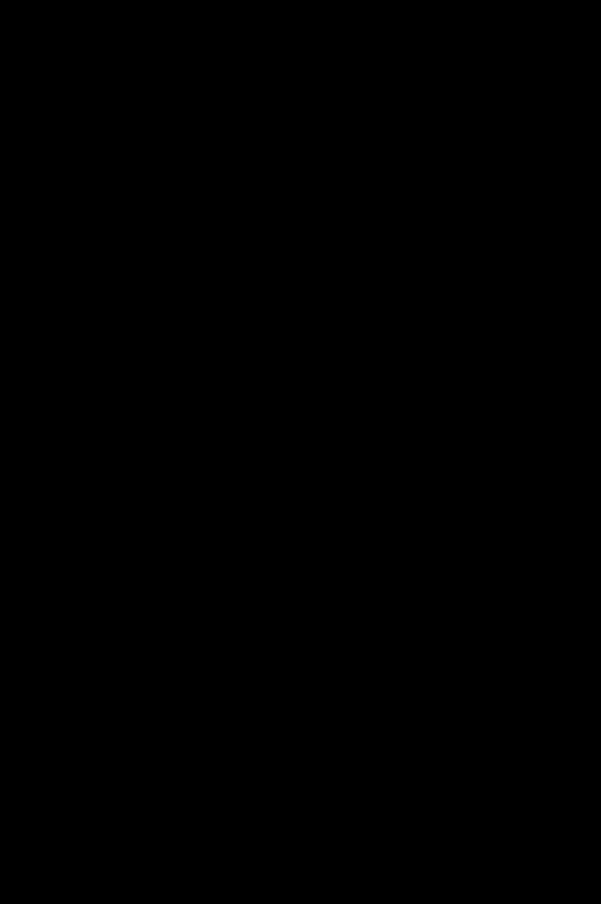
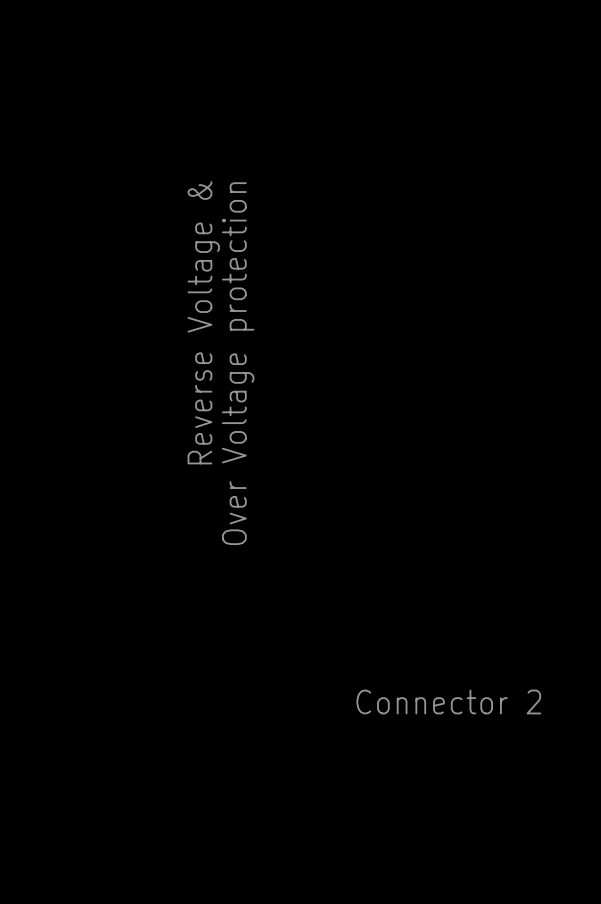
text: none -> Reverse Voltage & (203, 322)
text: none -> Over Voltage protection (238, 363)
text: none -> Connector 2 (448, 701)

